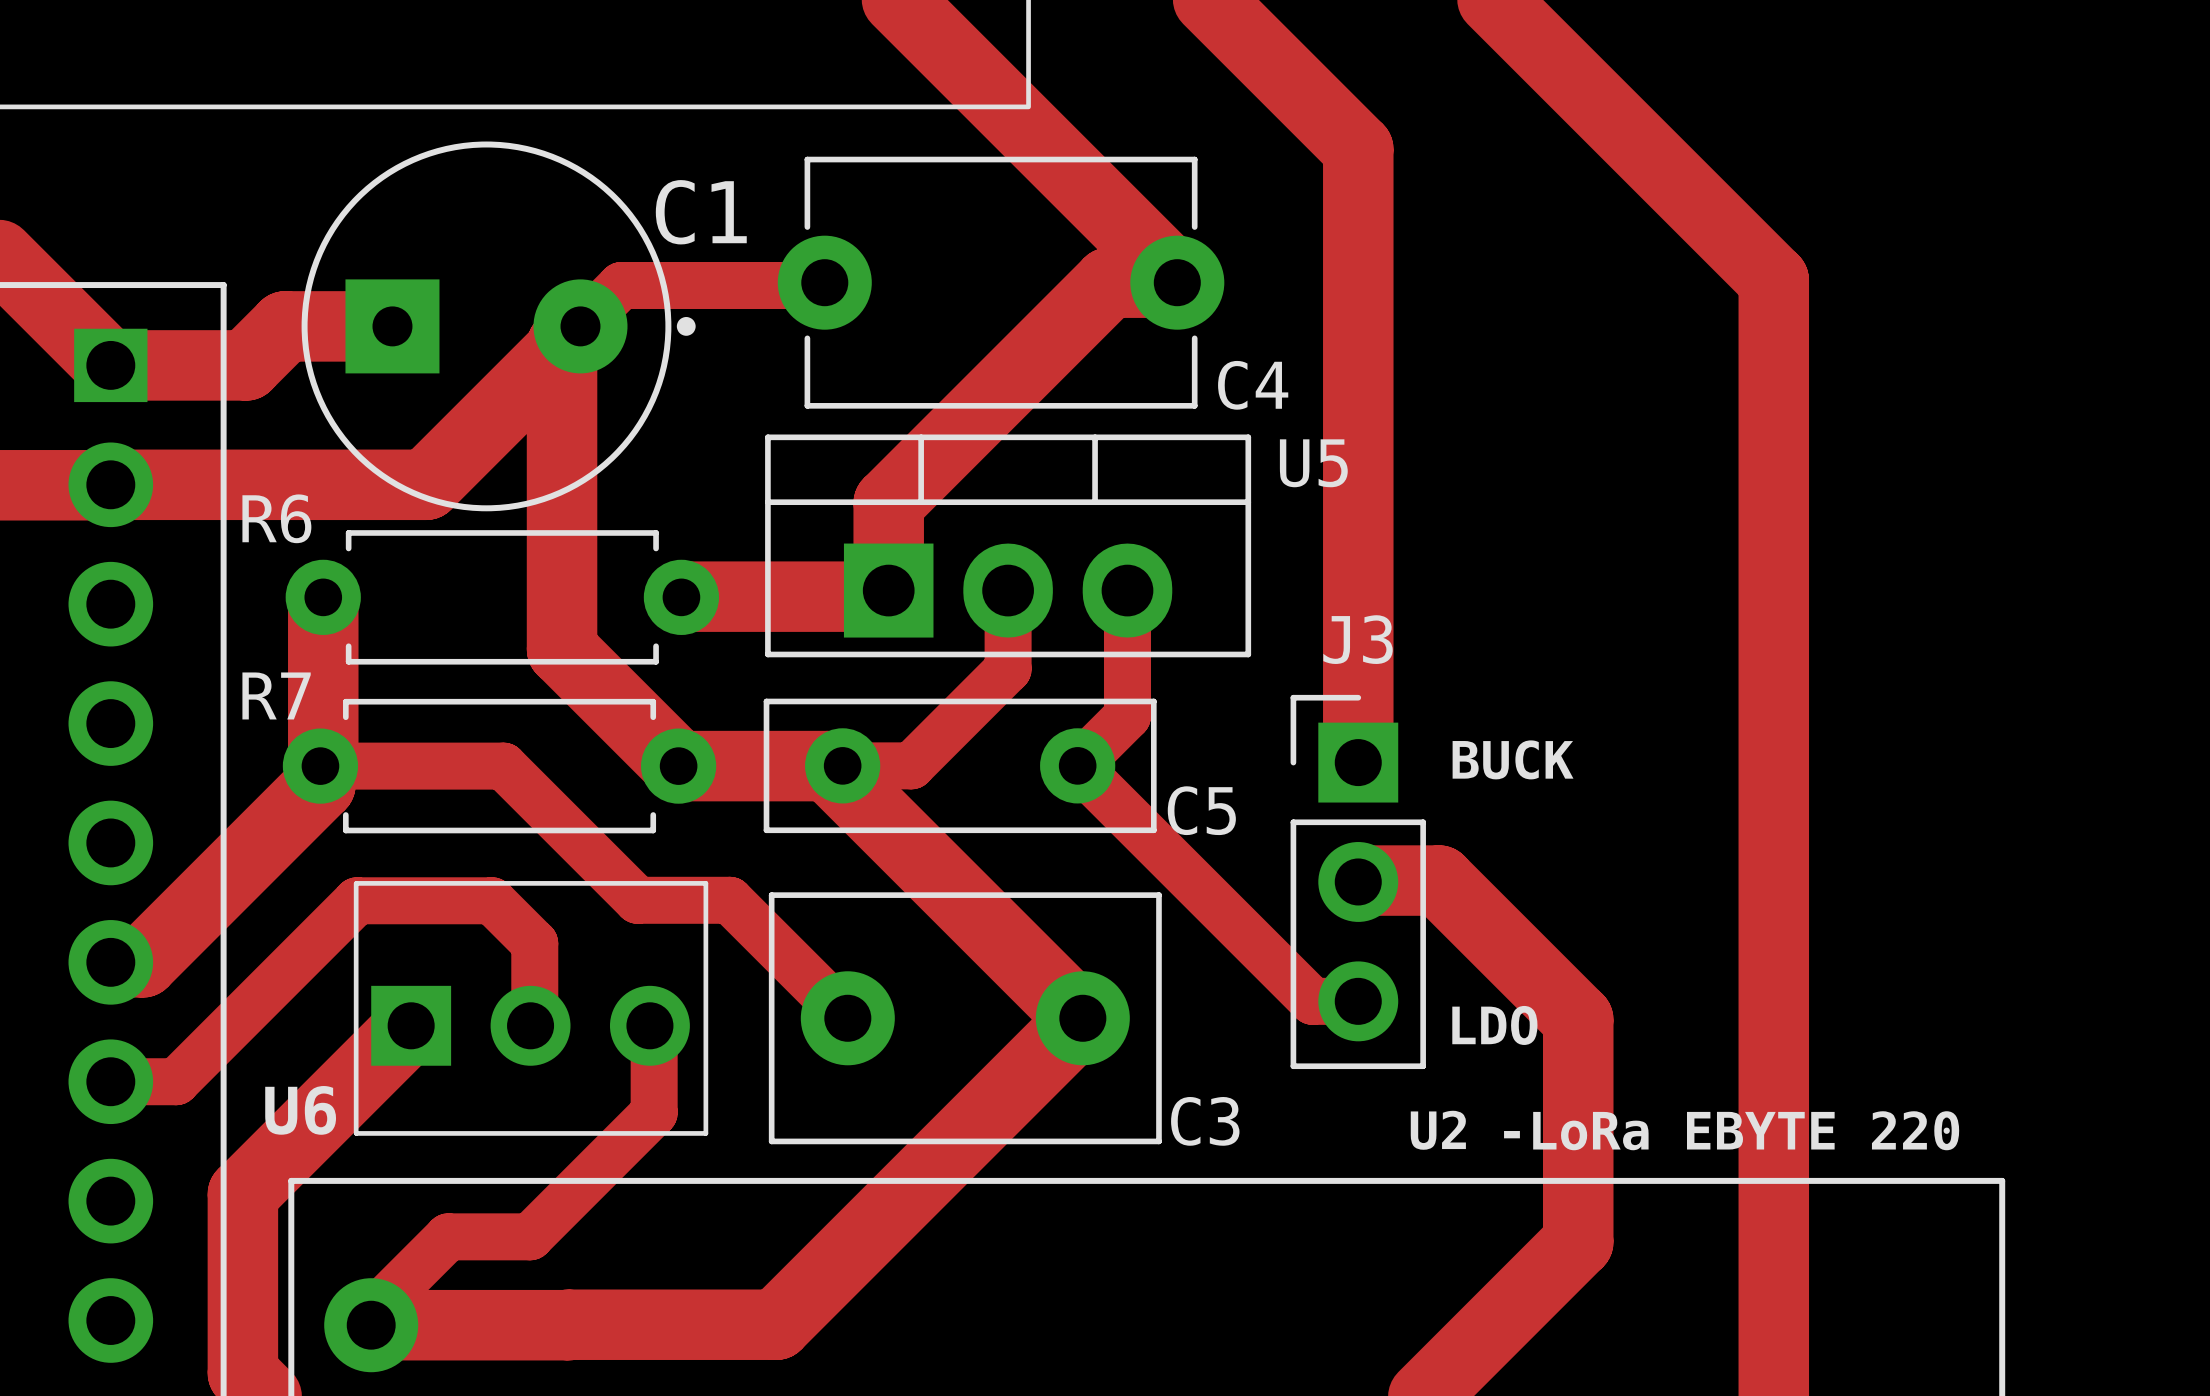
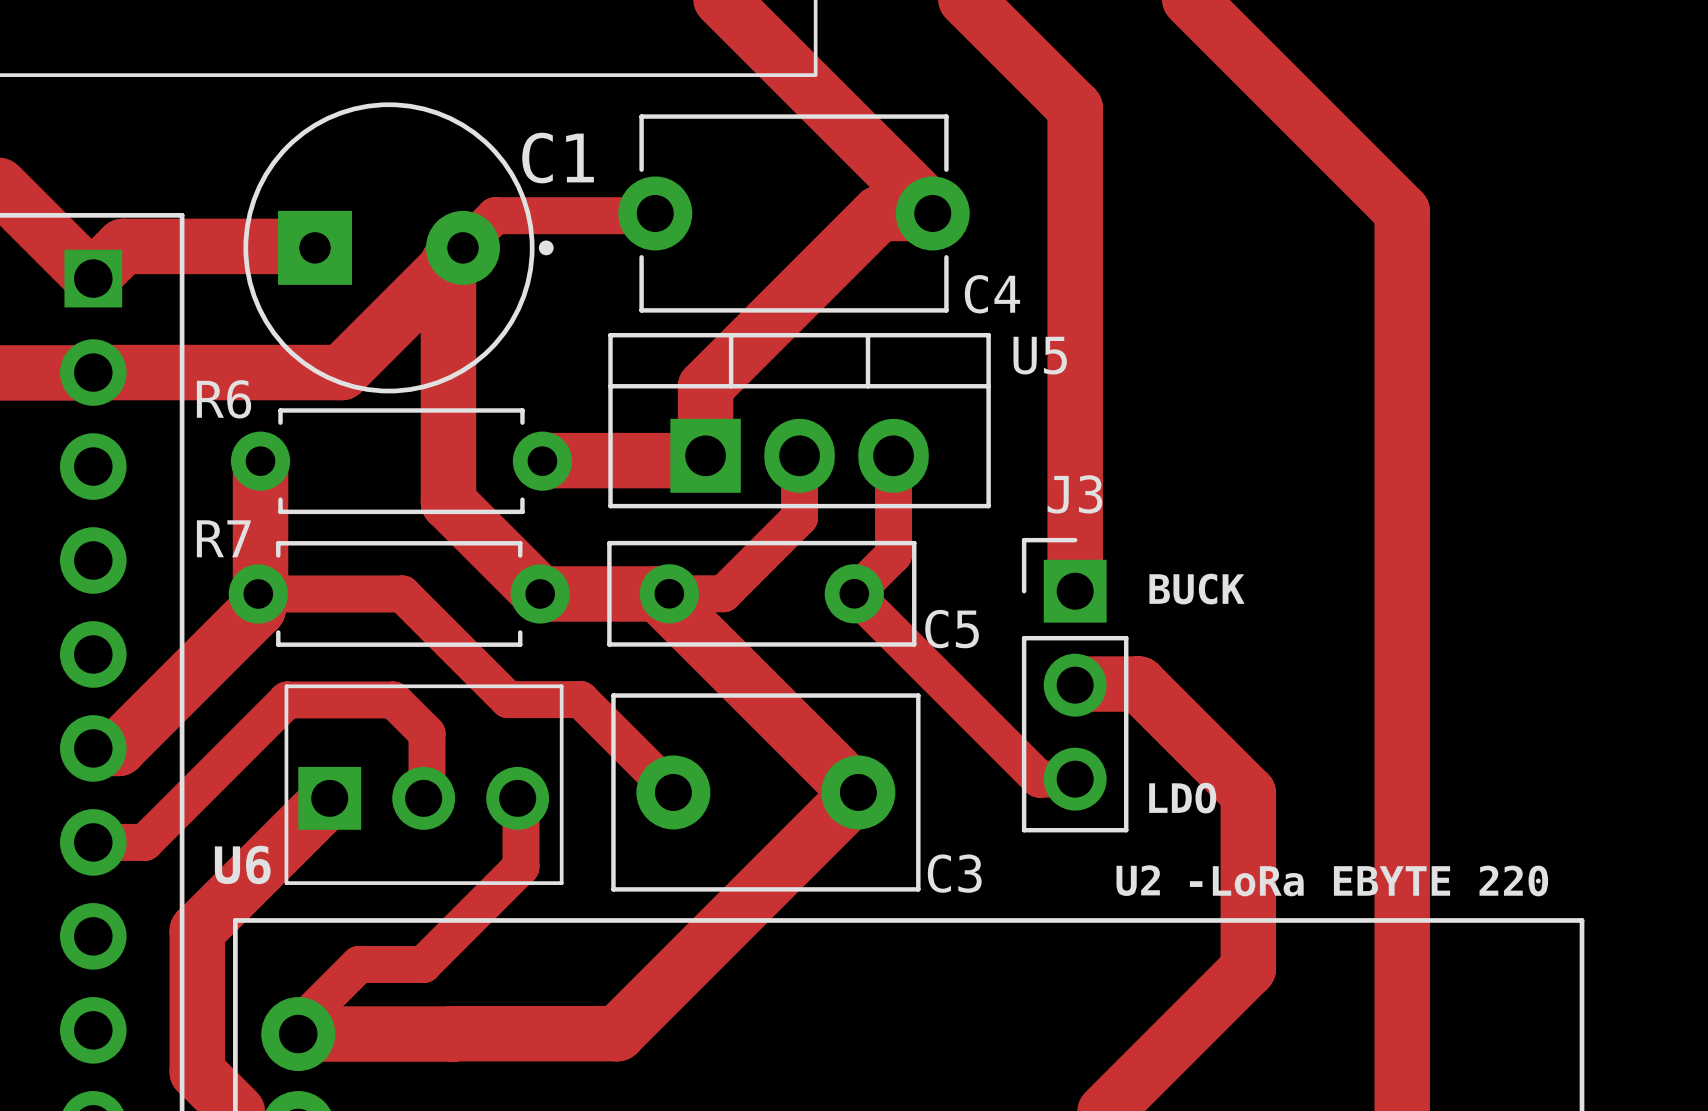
track: (392, 326) (285, 326) (246, 365) (109, 364) -> (313, 246) (123, 246) (92, 277)

